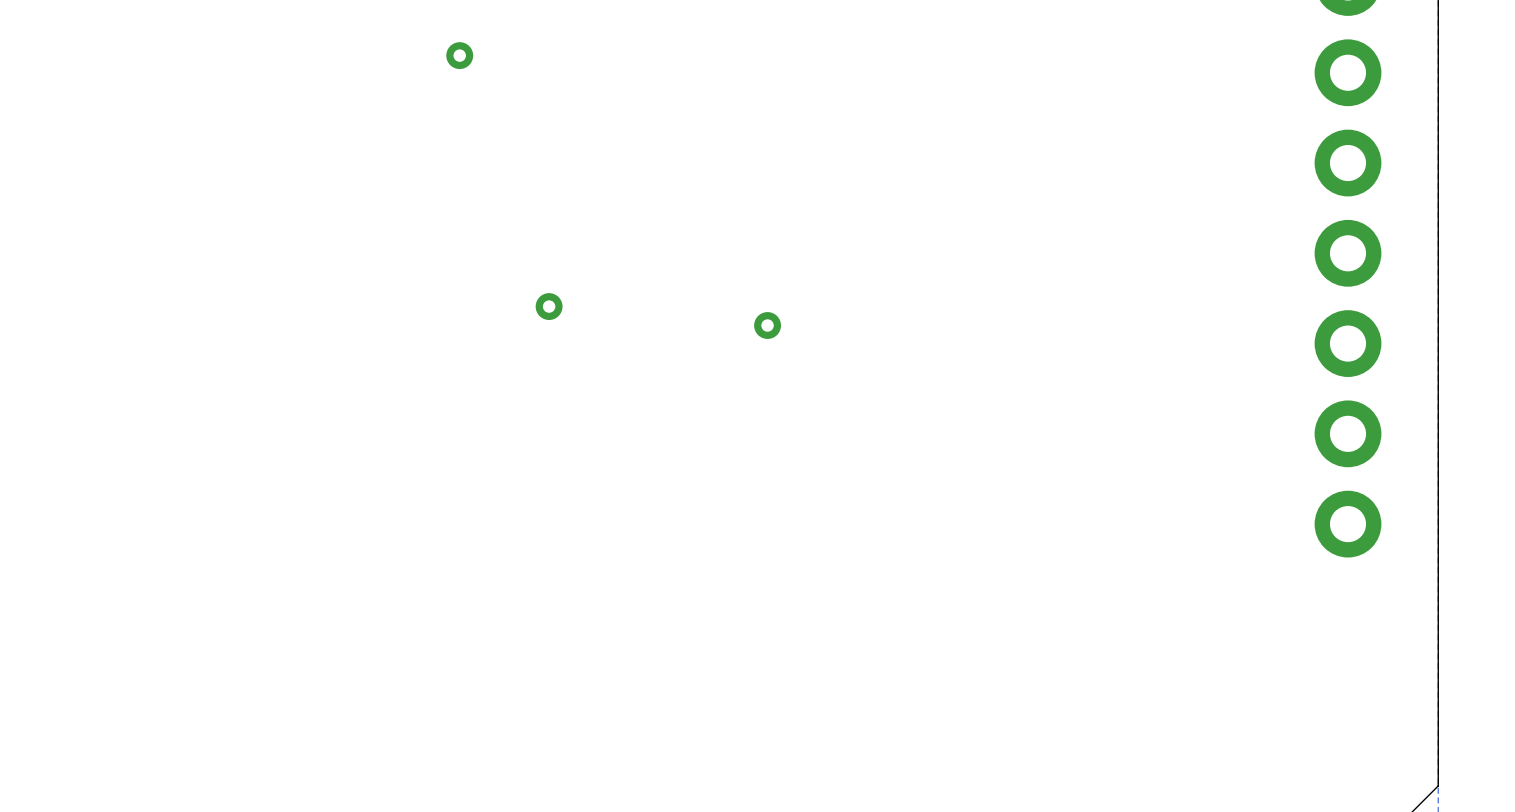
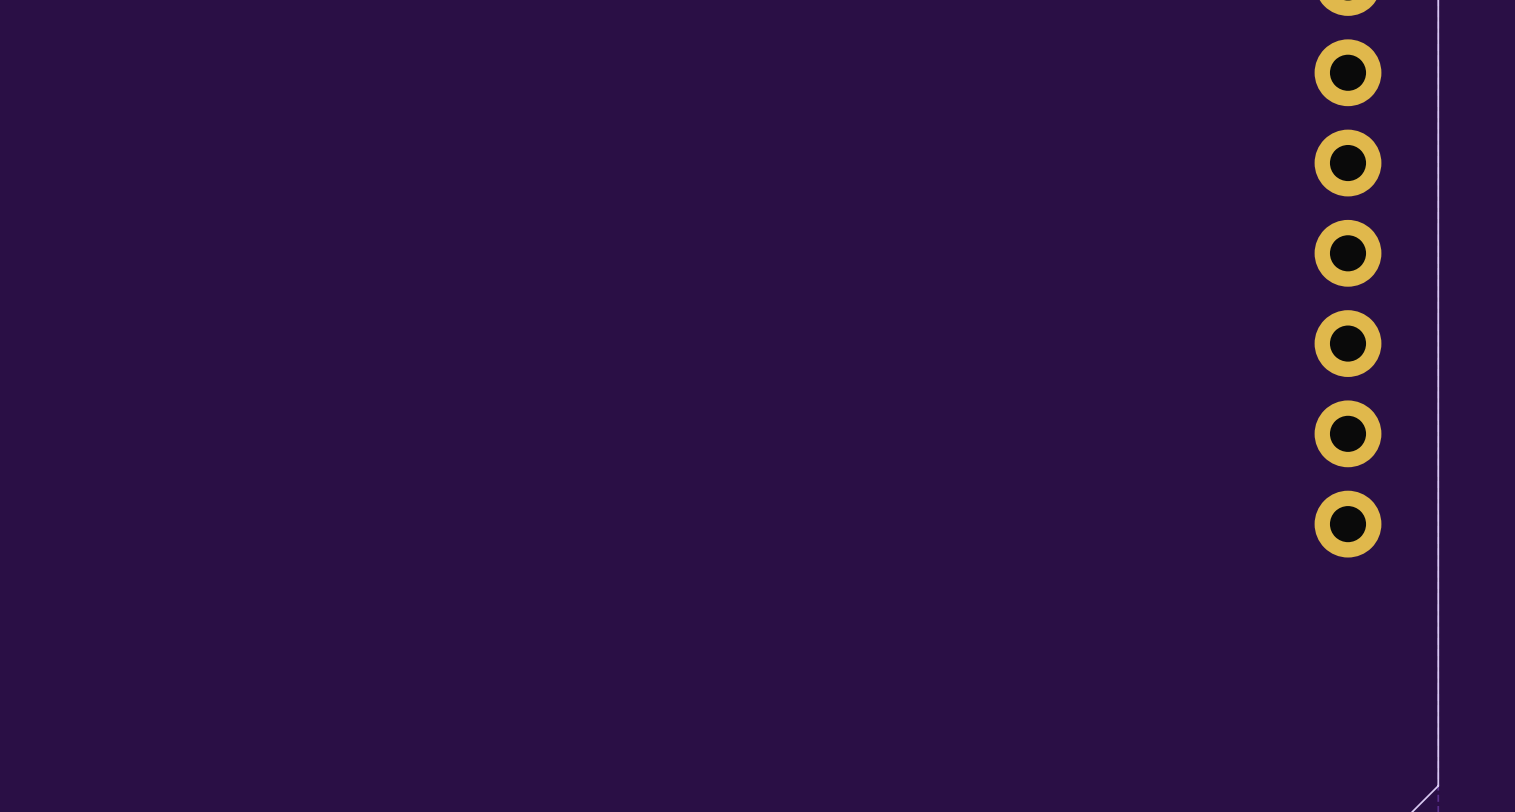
via: (459, 55) -> none
via: (549, 306) -> none
via: (767, 325) -> none

